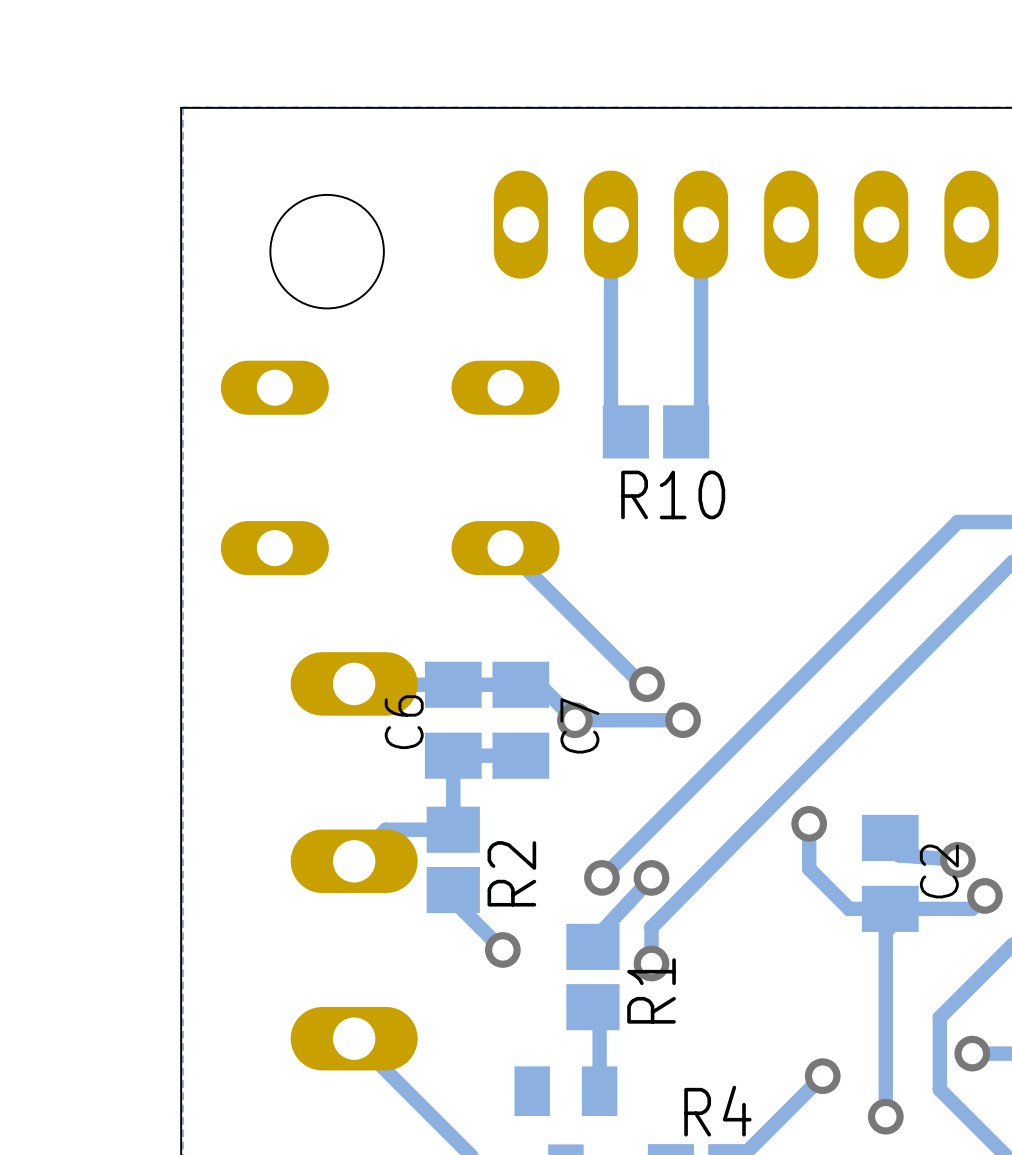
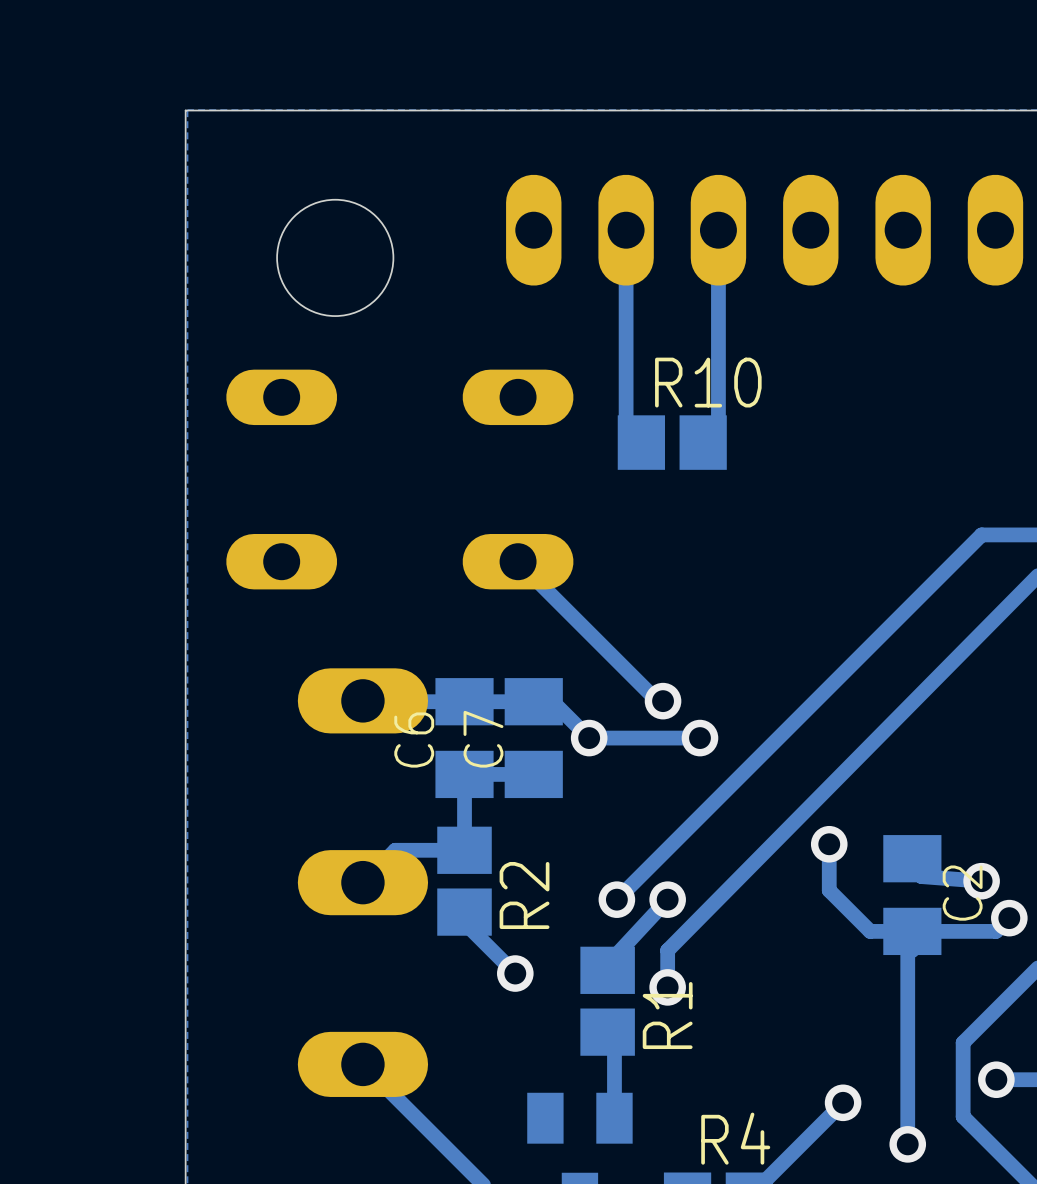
R10 name position: R10 (673, 494) -> R10 (708, 382)
C7 name position: C7 (579, 725) -> C7 (483, 739)

